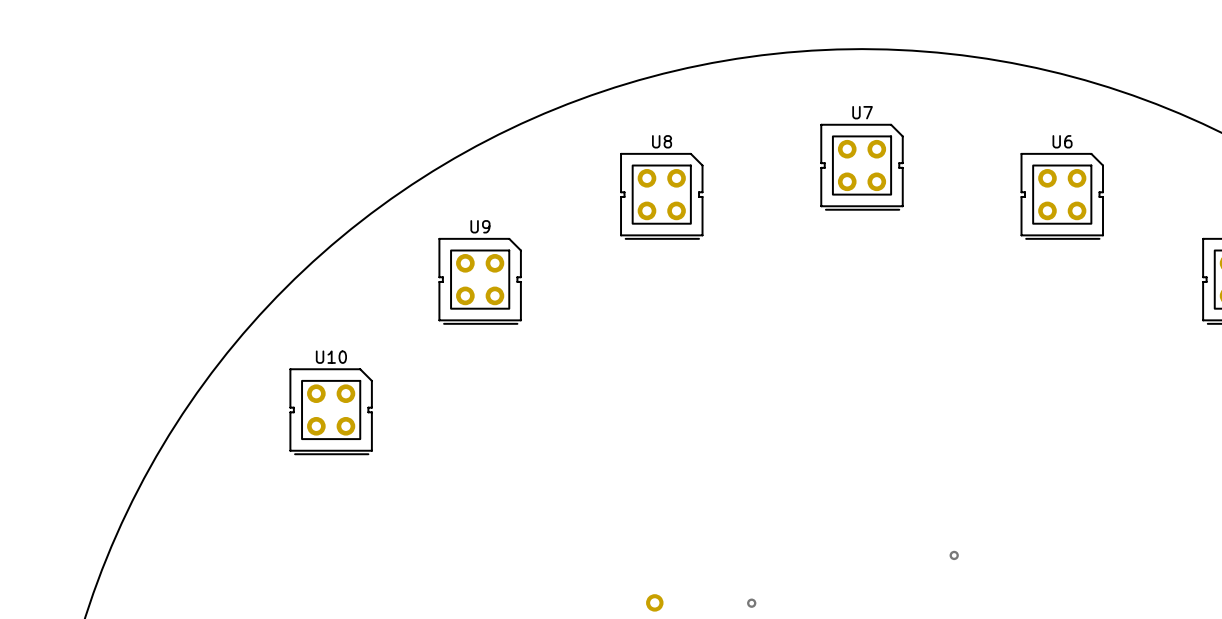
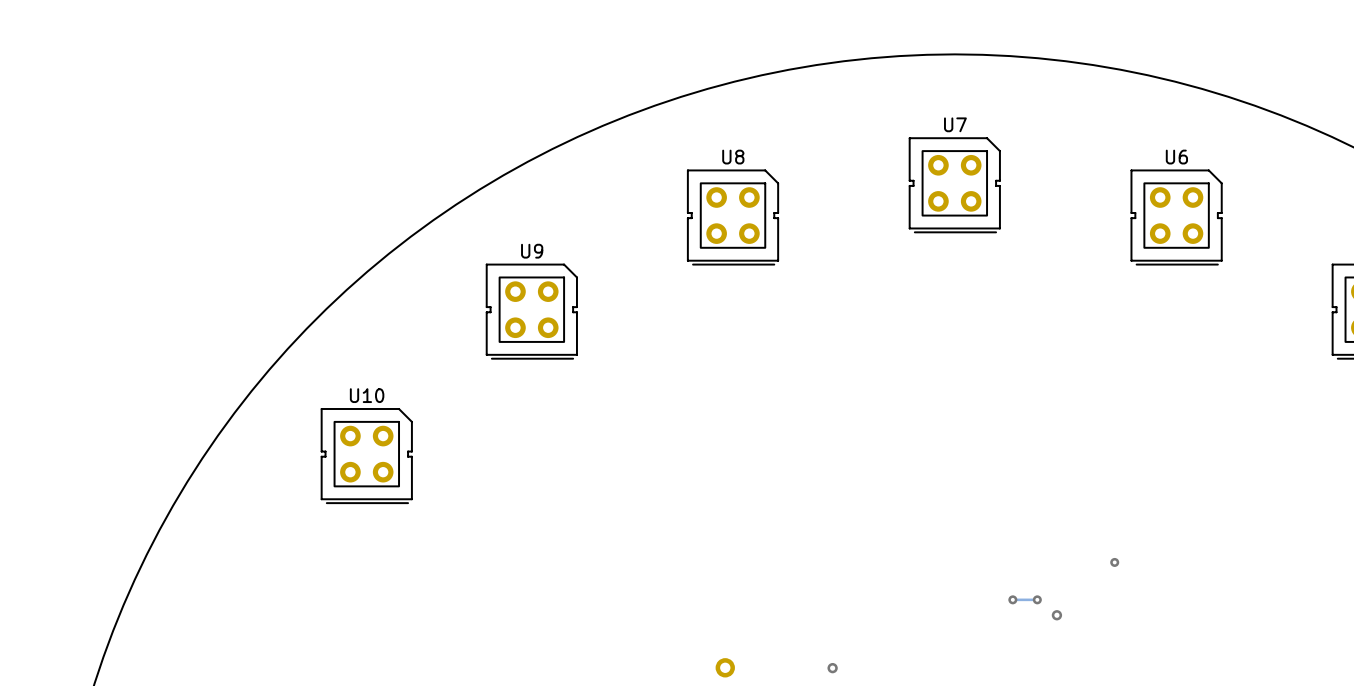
via: none -> (1114, 562)
via: none -> (1012, 599)
track: none -> (1037, 599) (1012, 599)
via: none -> (1037, 599)

